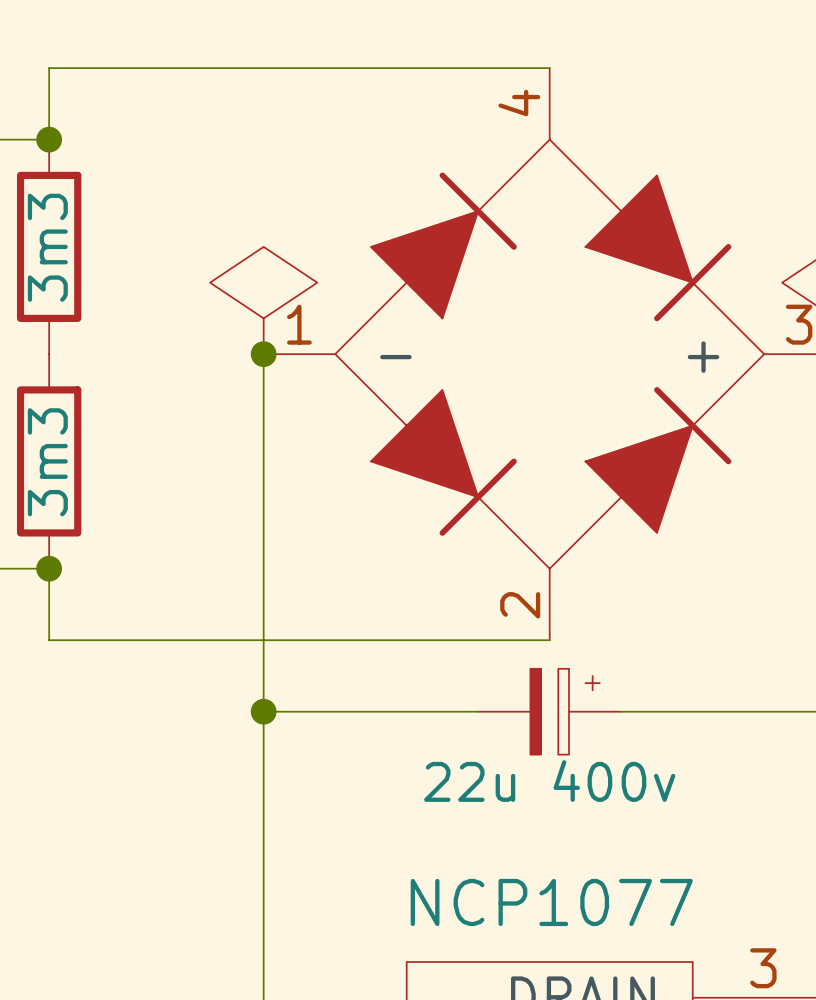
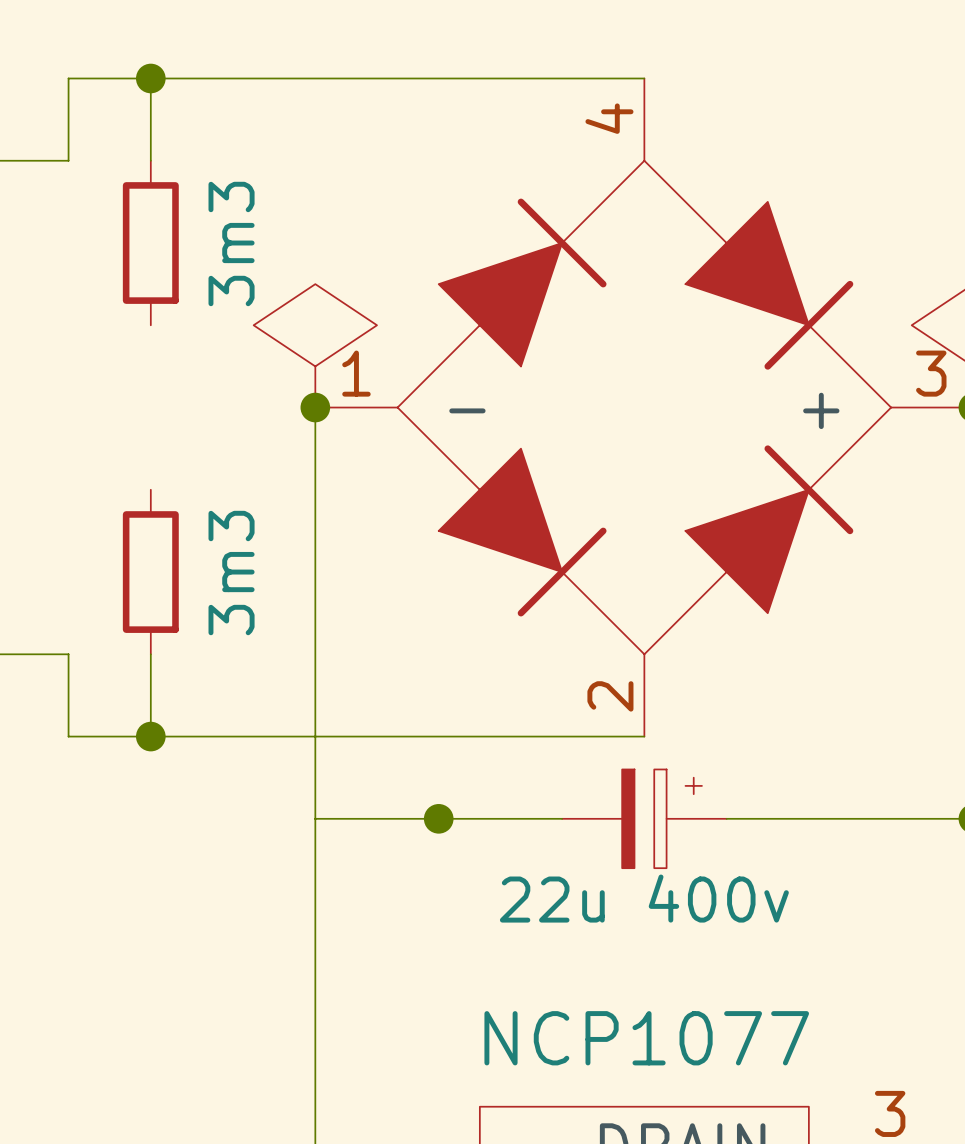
wire: none -> (150, 78) (150, 160)
junction position: (49, 139) -> (150, 78)
part: none -> 3m3 (150, 243)
part: 3m3 (49, 246) -> none
part: 3m3 (49, 461) -> none
part: none -> 3m3 (150, 572)
junction: (49, 568) -> none
wire: none -> (150, 654) (150, 736)
junction: none -> (150, 736)
junction: (263, 711) -> none
junction: none -> (438, 818)

